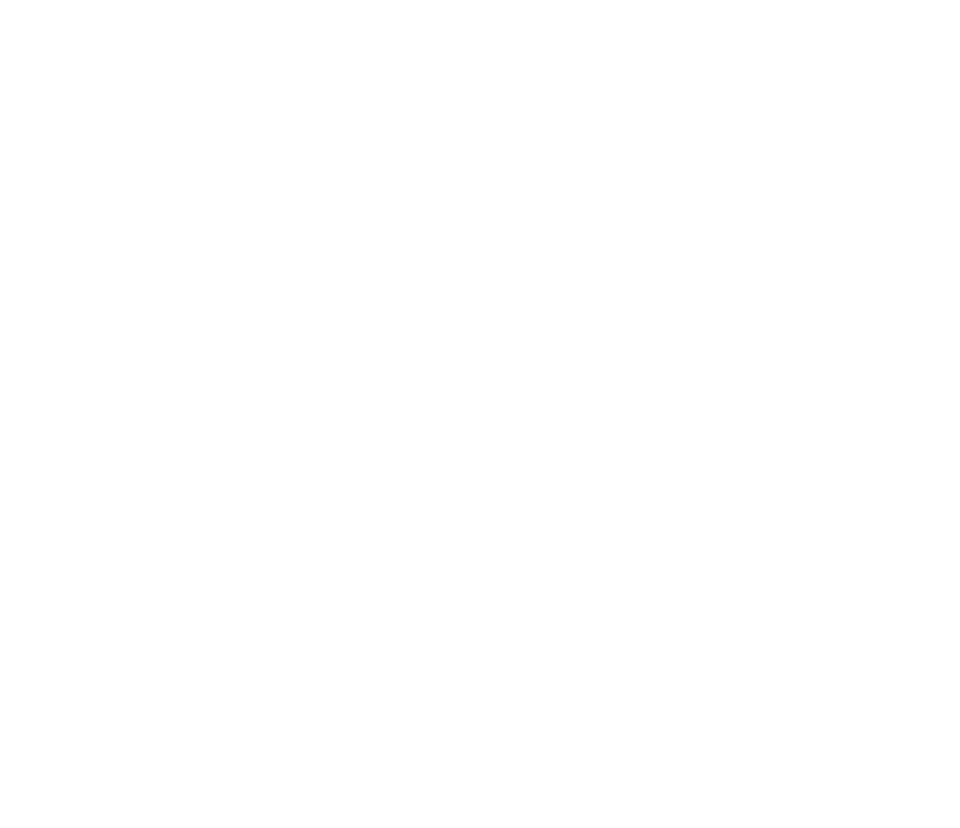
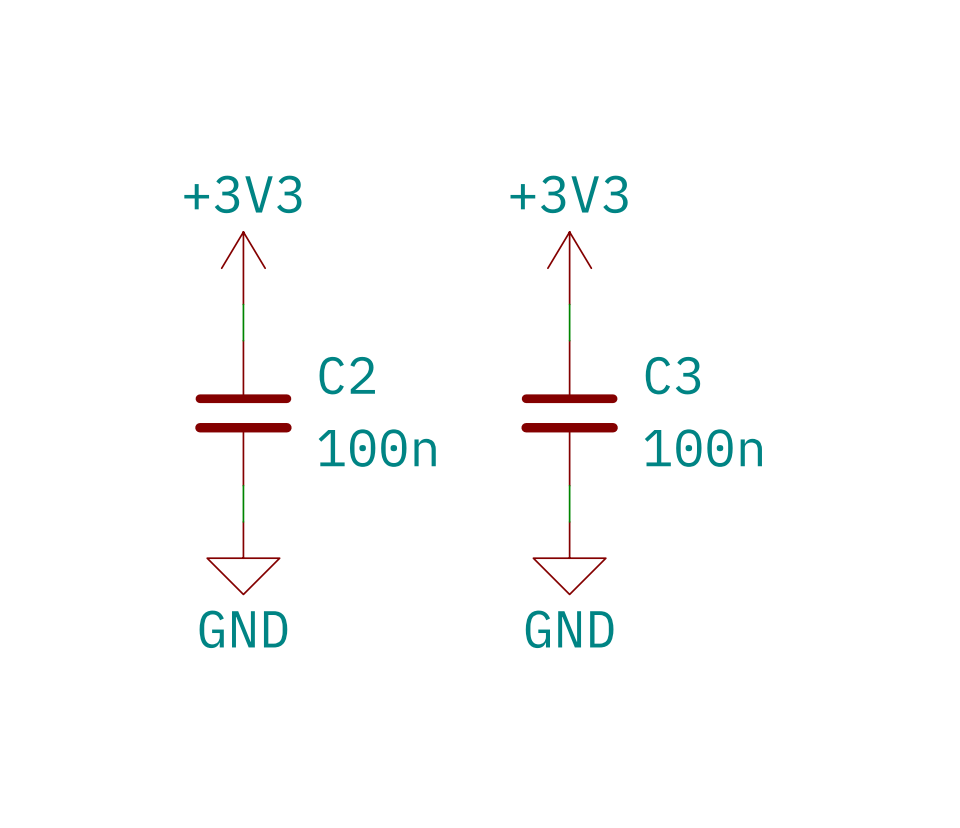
power symbol: none -> +3V3 (243, 268)
power symbol: none -> +3V3 (569, 268)
wire: none -> (243, 304) (243, 340)
wire: none -> (569, 304) (569, 340)
C2: none -> 100n (243, 413)
C3: none -> 100n (569, 413)
wire: none -> (243, 485) (243, 521)
wire: none -> (569, 485) (569, 521)
power symbol: none -> GND (243, 558)
power symbol: none -> GND (569, 558)

